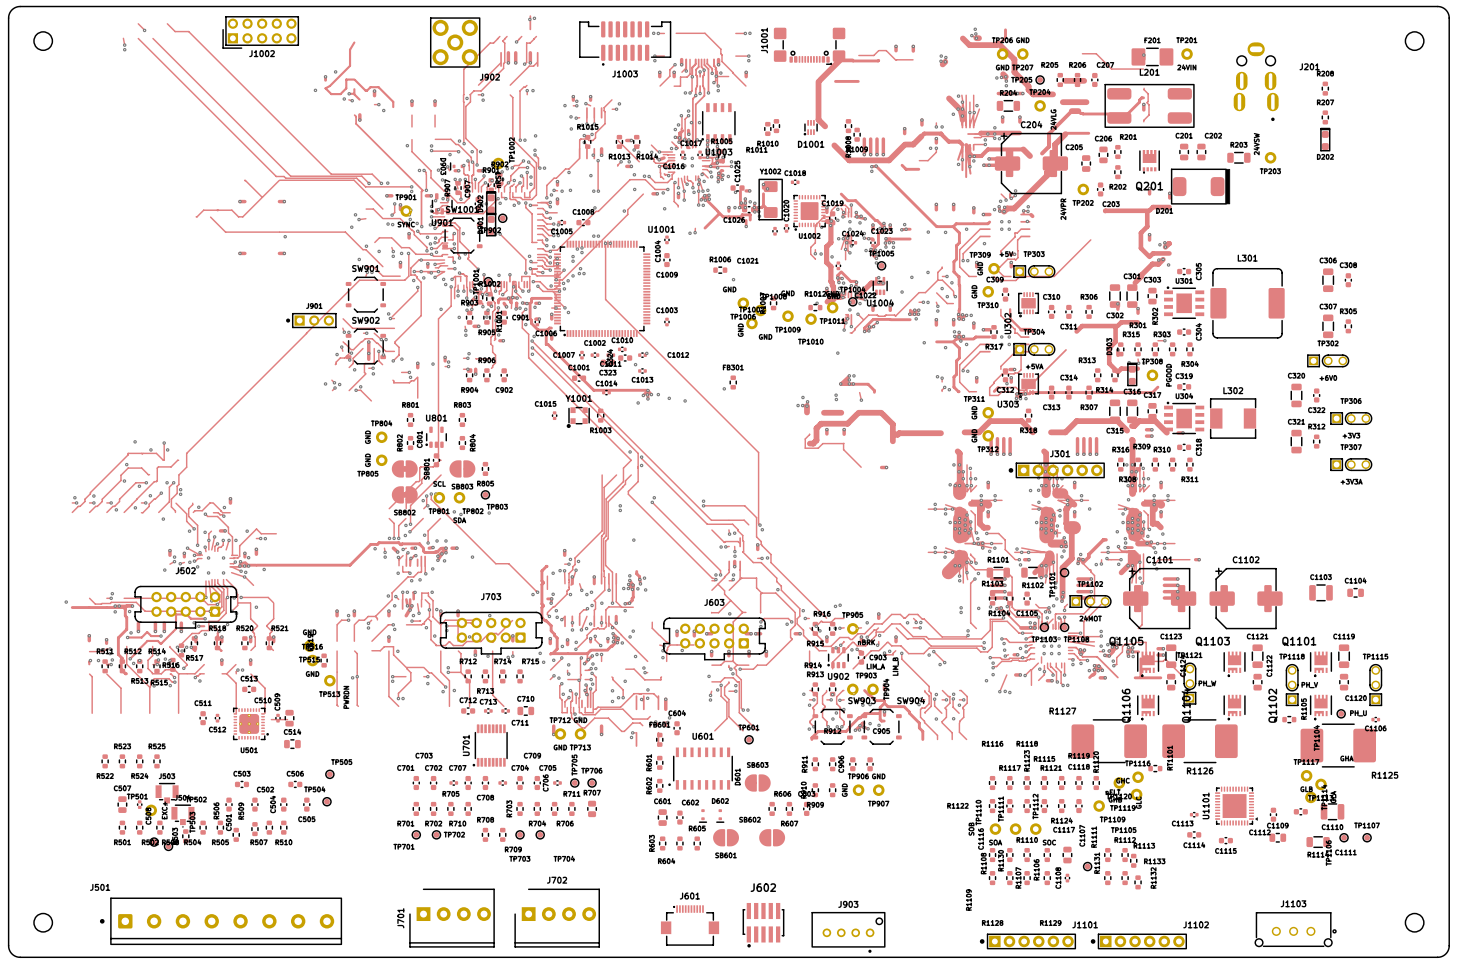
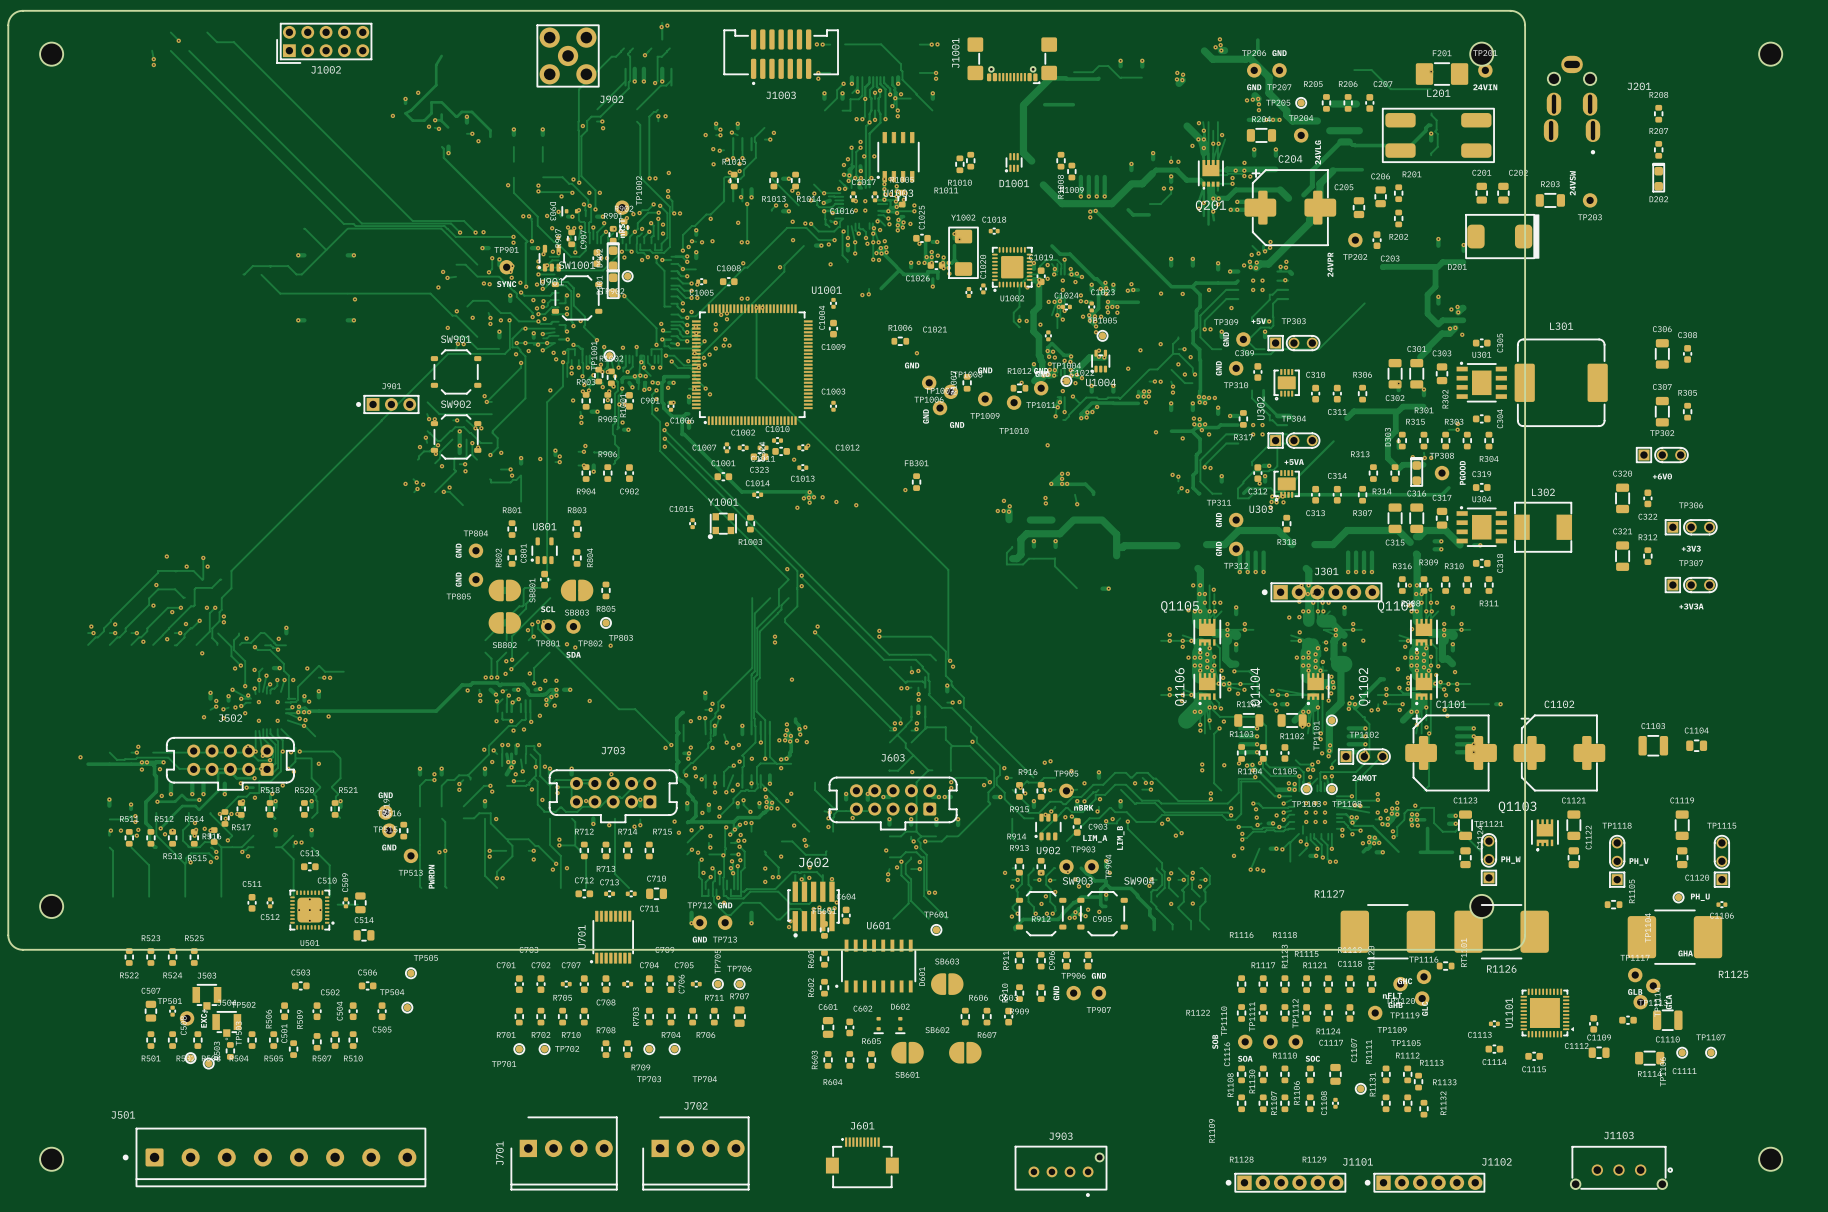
board edge: (1207, 6) (1437, 6) (1444, 9) (1448, 15) (1449, 945) (1443, 955) (1437, 957) (18, 957) (11, 953) (8, 945) (8, 744) -> (1510, 10) (1520, 15) (1525, 25) (1525, 935) (1523, 942) (1517, 947) (1510, 949) (22, 949) (12, 945) (8, 935)
part: none -> (1481, 54)
Q201 position: (1149, 161) -> (1210, 174)
Q1105 position: (1148, 664) -> (1207, 634)
Q1101 position: (1321, 664) -> (1423, 634)
Q1106 position: (1148, 707) -> (1207, 689)
Q1104 position: (1234, 707) -> (1315, 689)
Q1102 position: (1321, 707) -> (1423, 689)
part: none -> (51, 906)
part: none -> (1481, 906)
J602 position: (763, 925) -> (813, 909)

